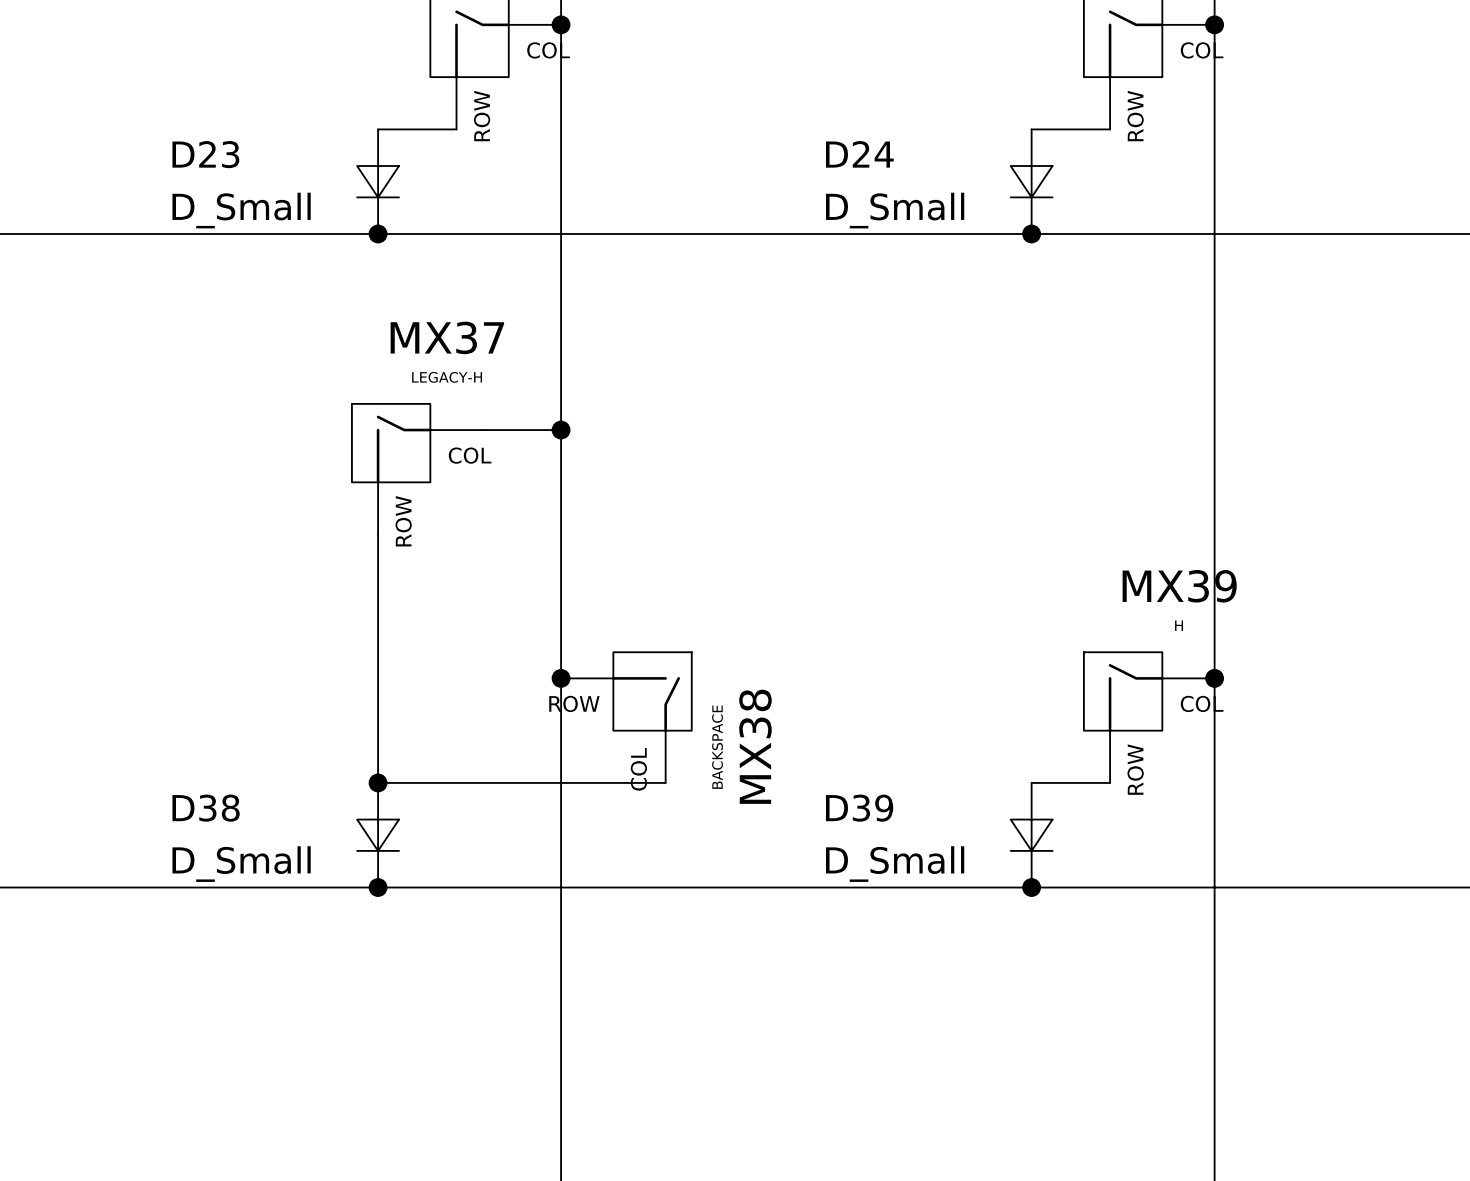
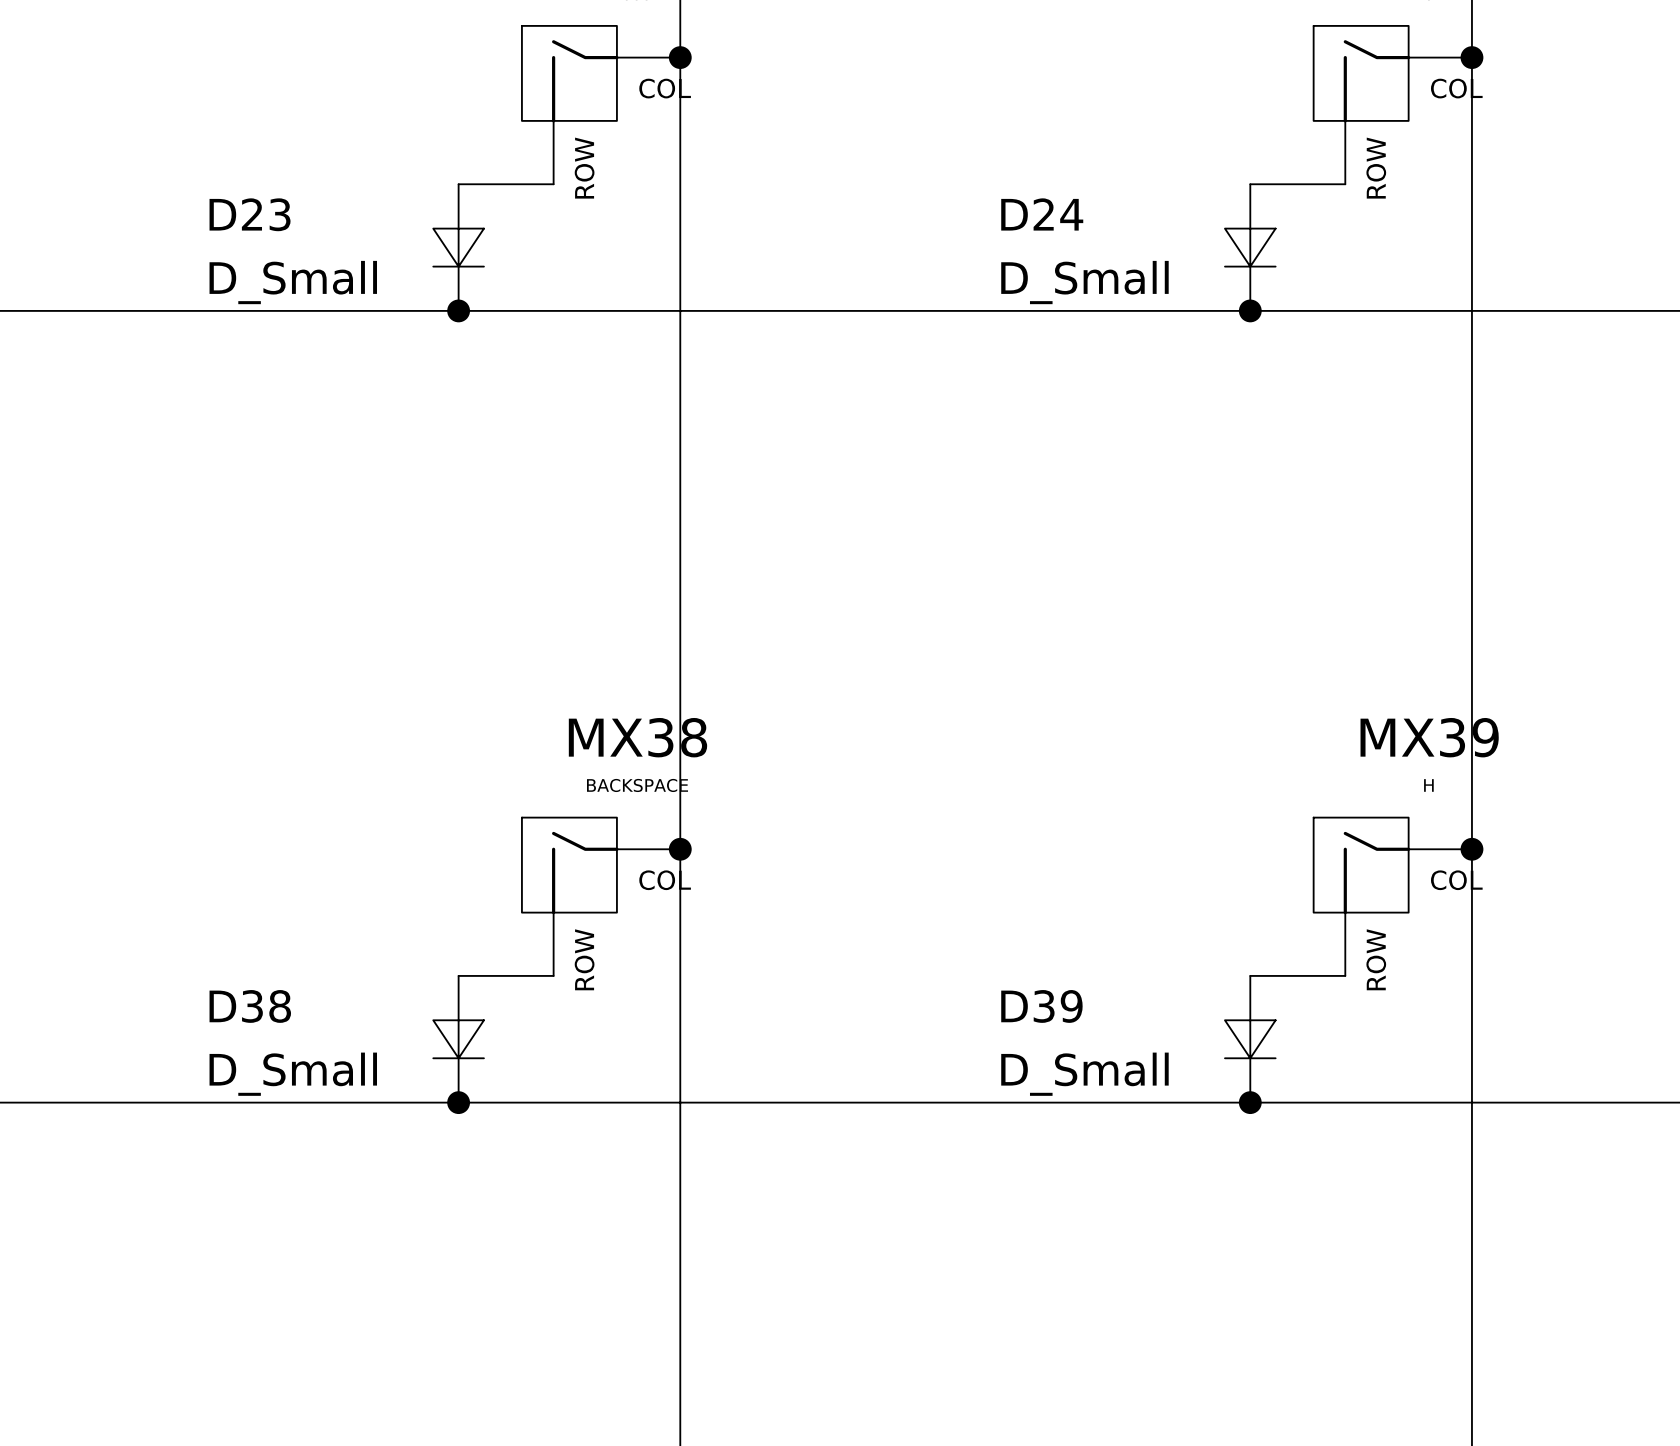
wire: (482, 430) (561, 430) -> none
junction: (561, 430) -> none
MX37: LEGACY-H (417, 469) -> none
wire: (378, 534) (378, 782) -> none
MX38 rotation: 0° (651, 692) -> 90° counterclockwise (570, 865)
MX38 position: (626, 717) -> (601, 896)
junction: (378, 782) -> none
wire: (456, 782) (665, 782) -> none

